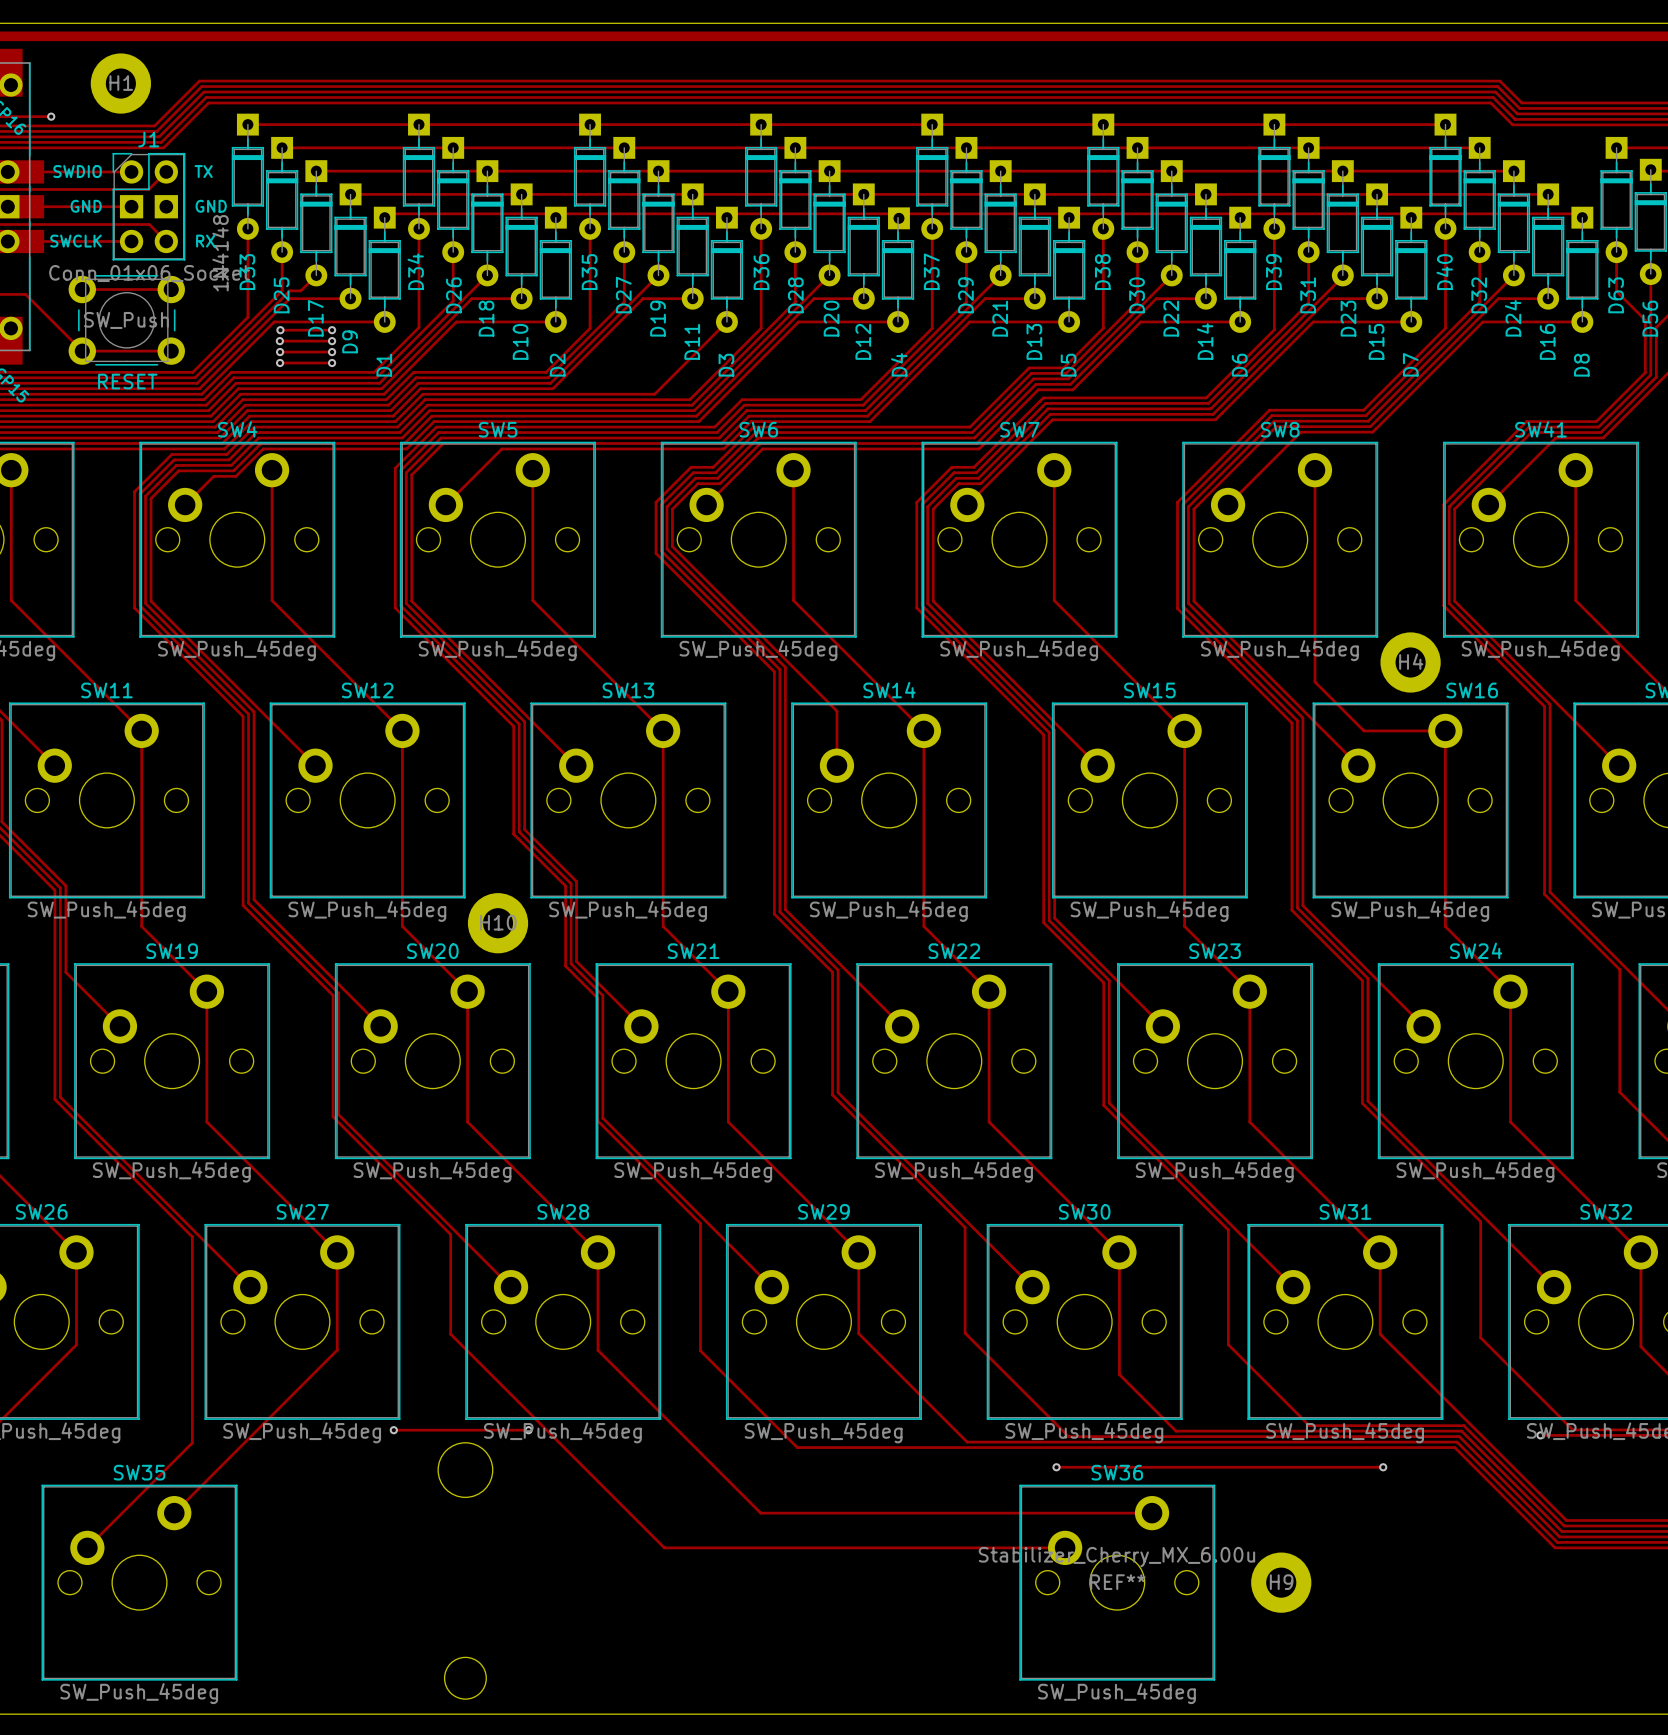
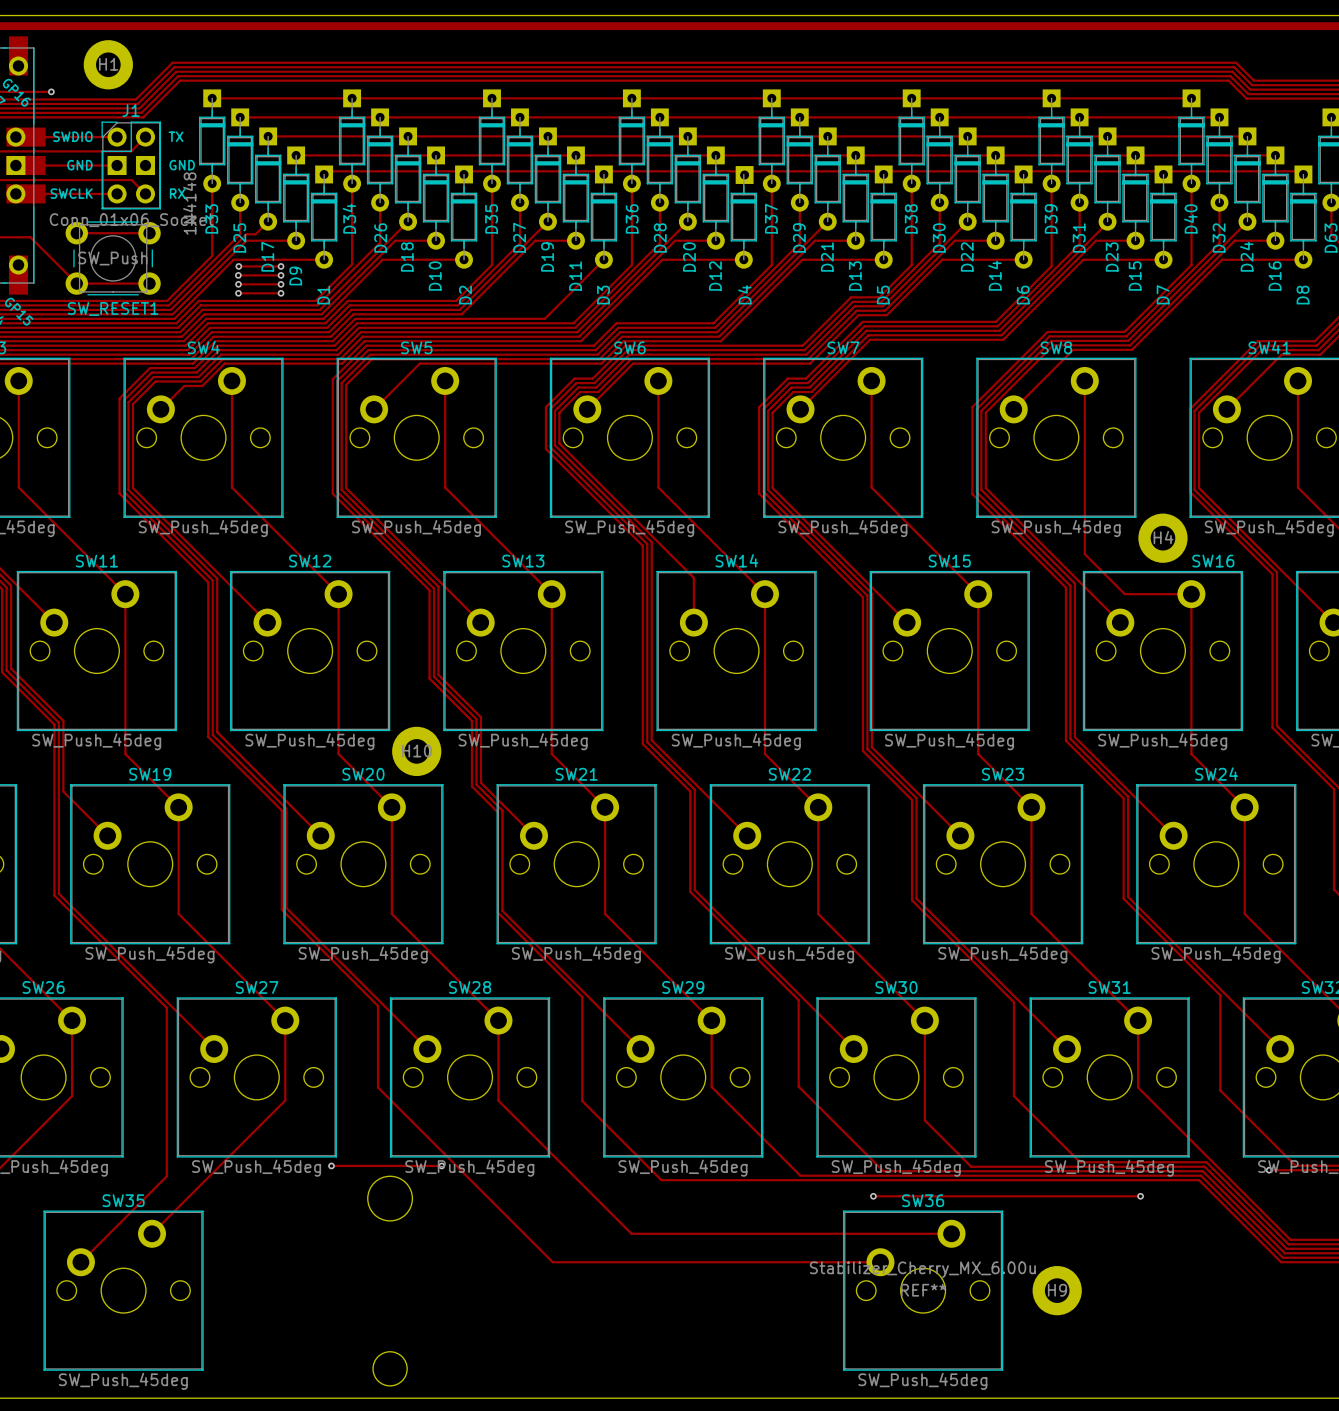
RESET name: RESET (127, 381) -> SW_RESET1 (113, 308)

